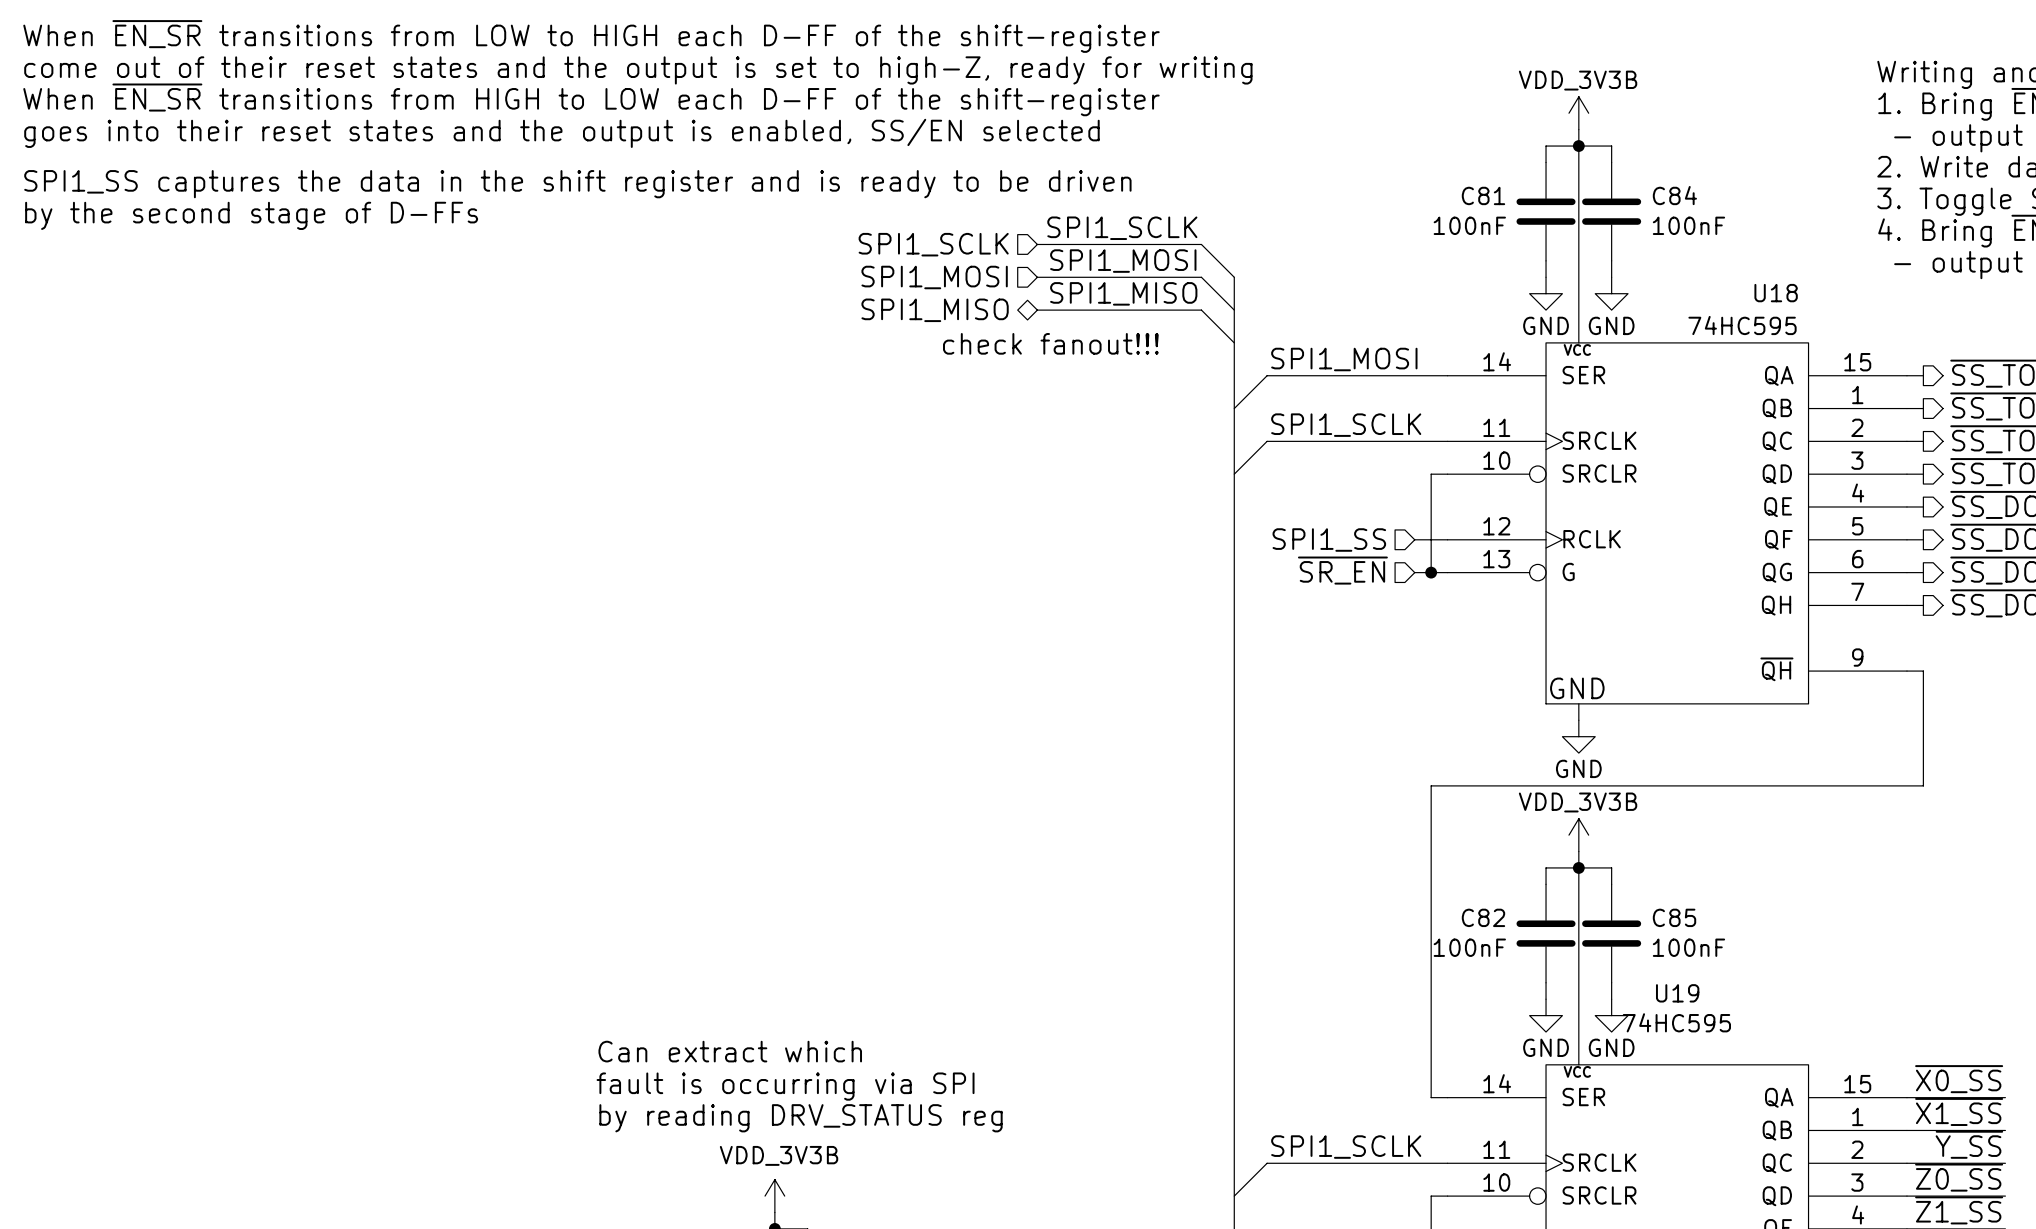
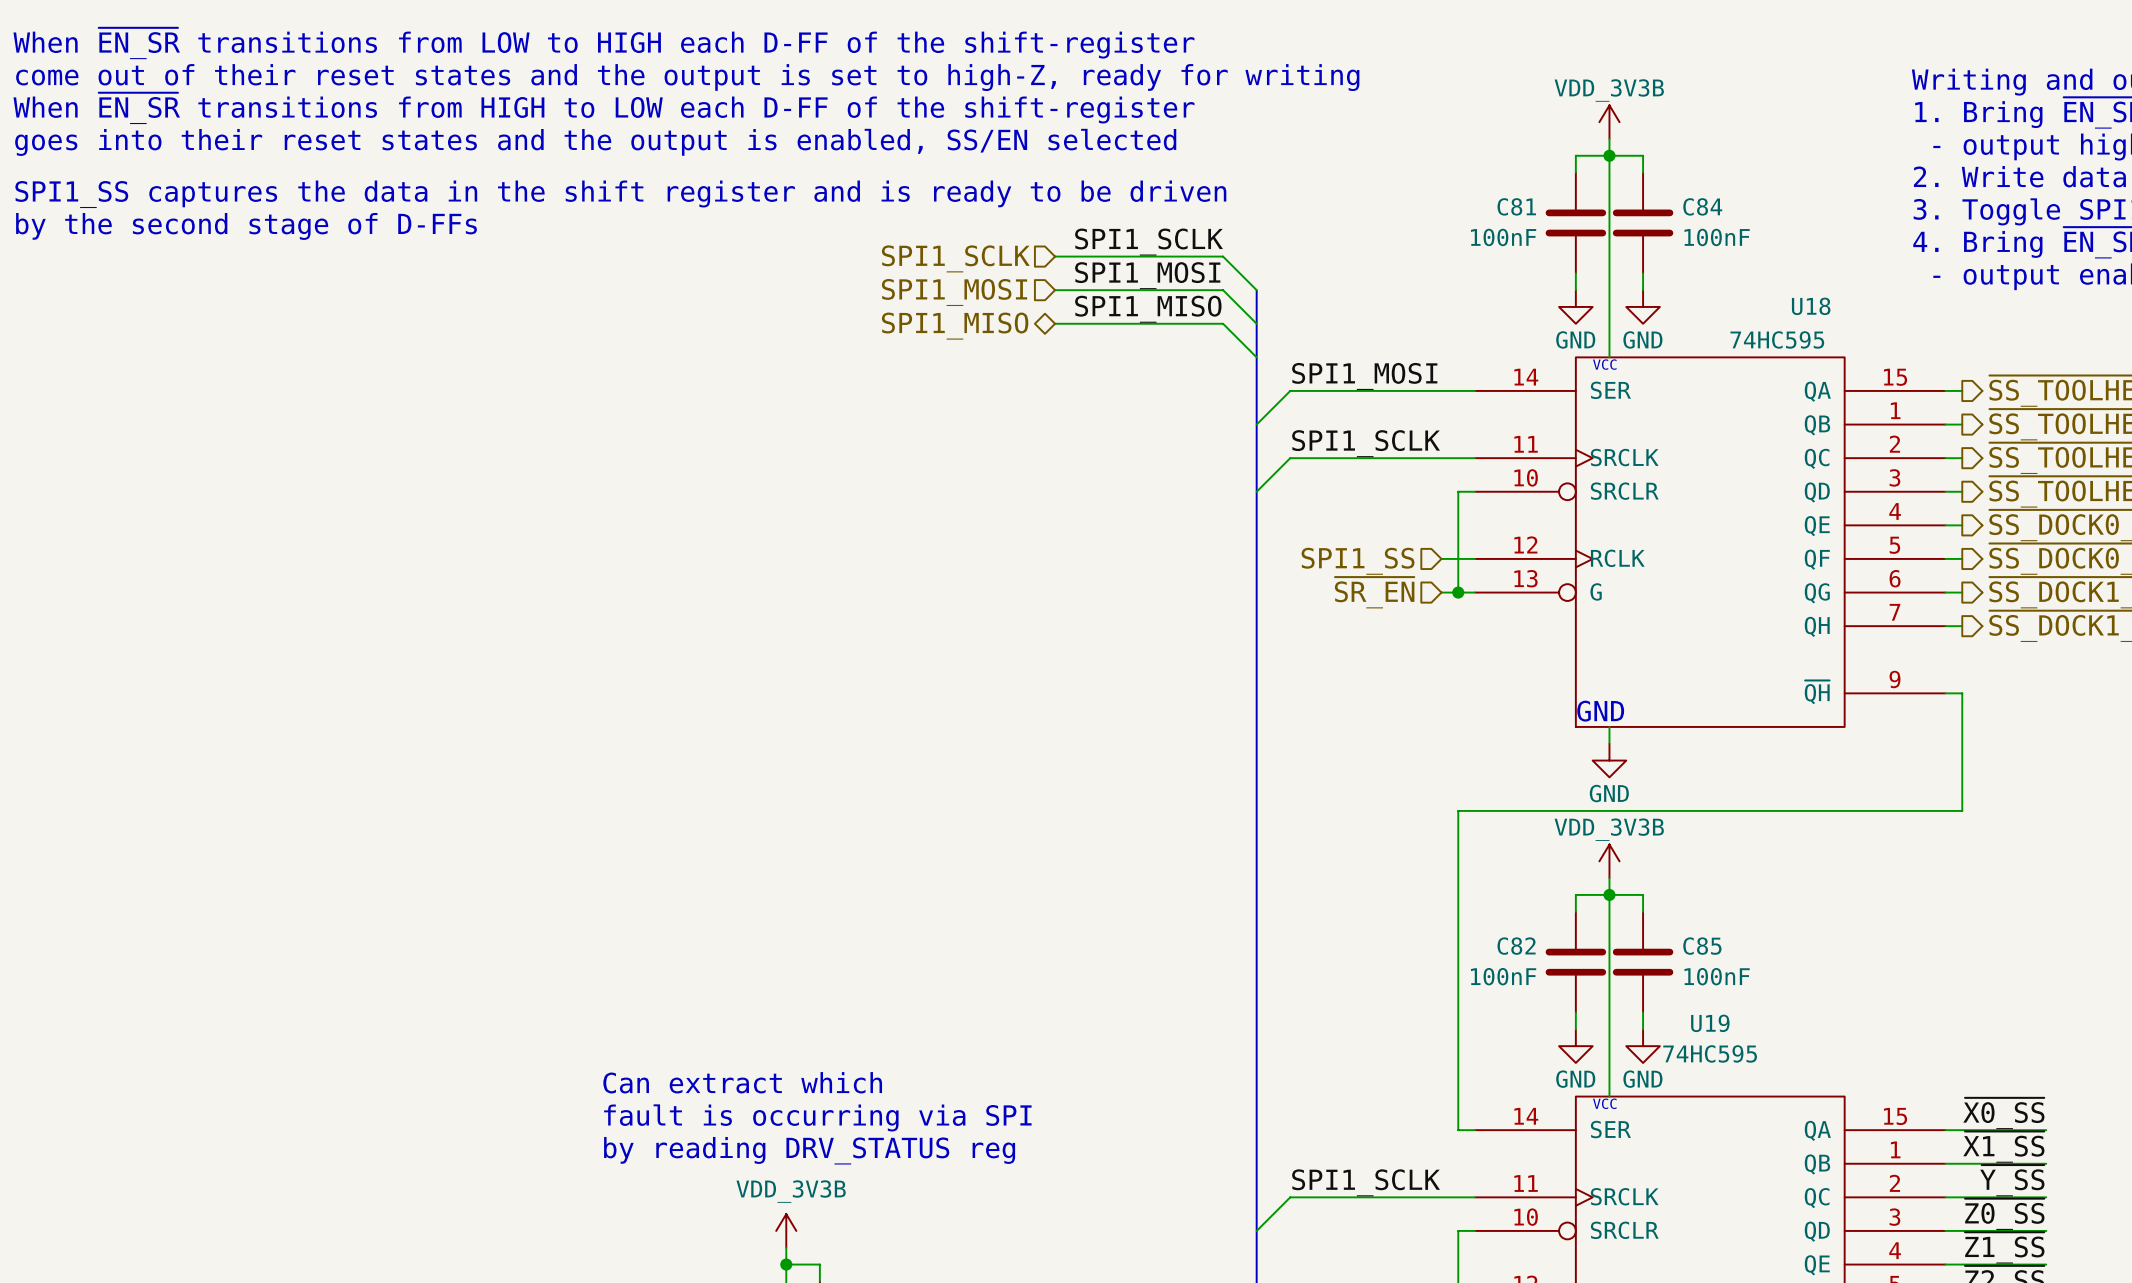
text: check fanout!!! (1050, 343) -> none

